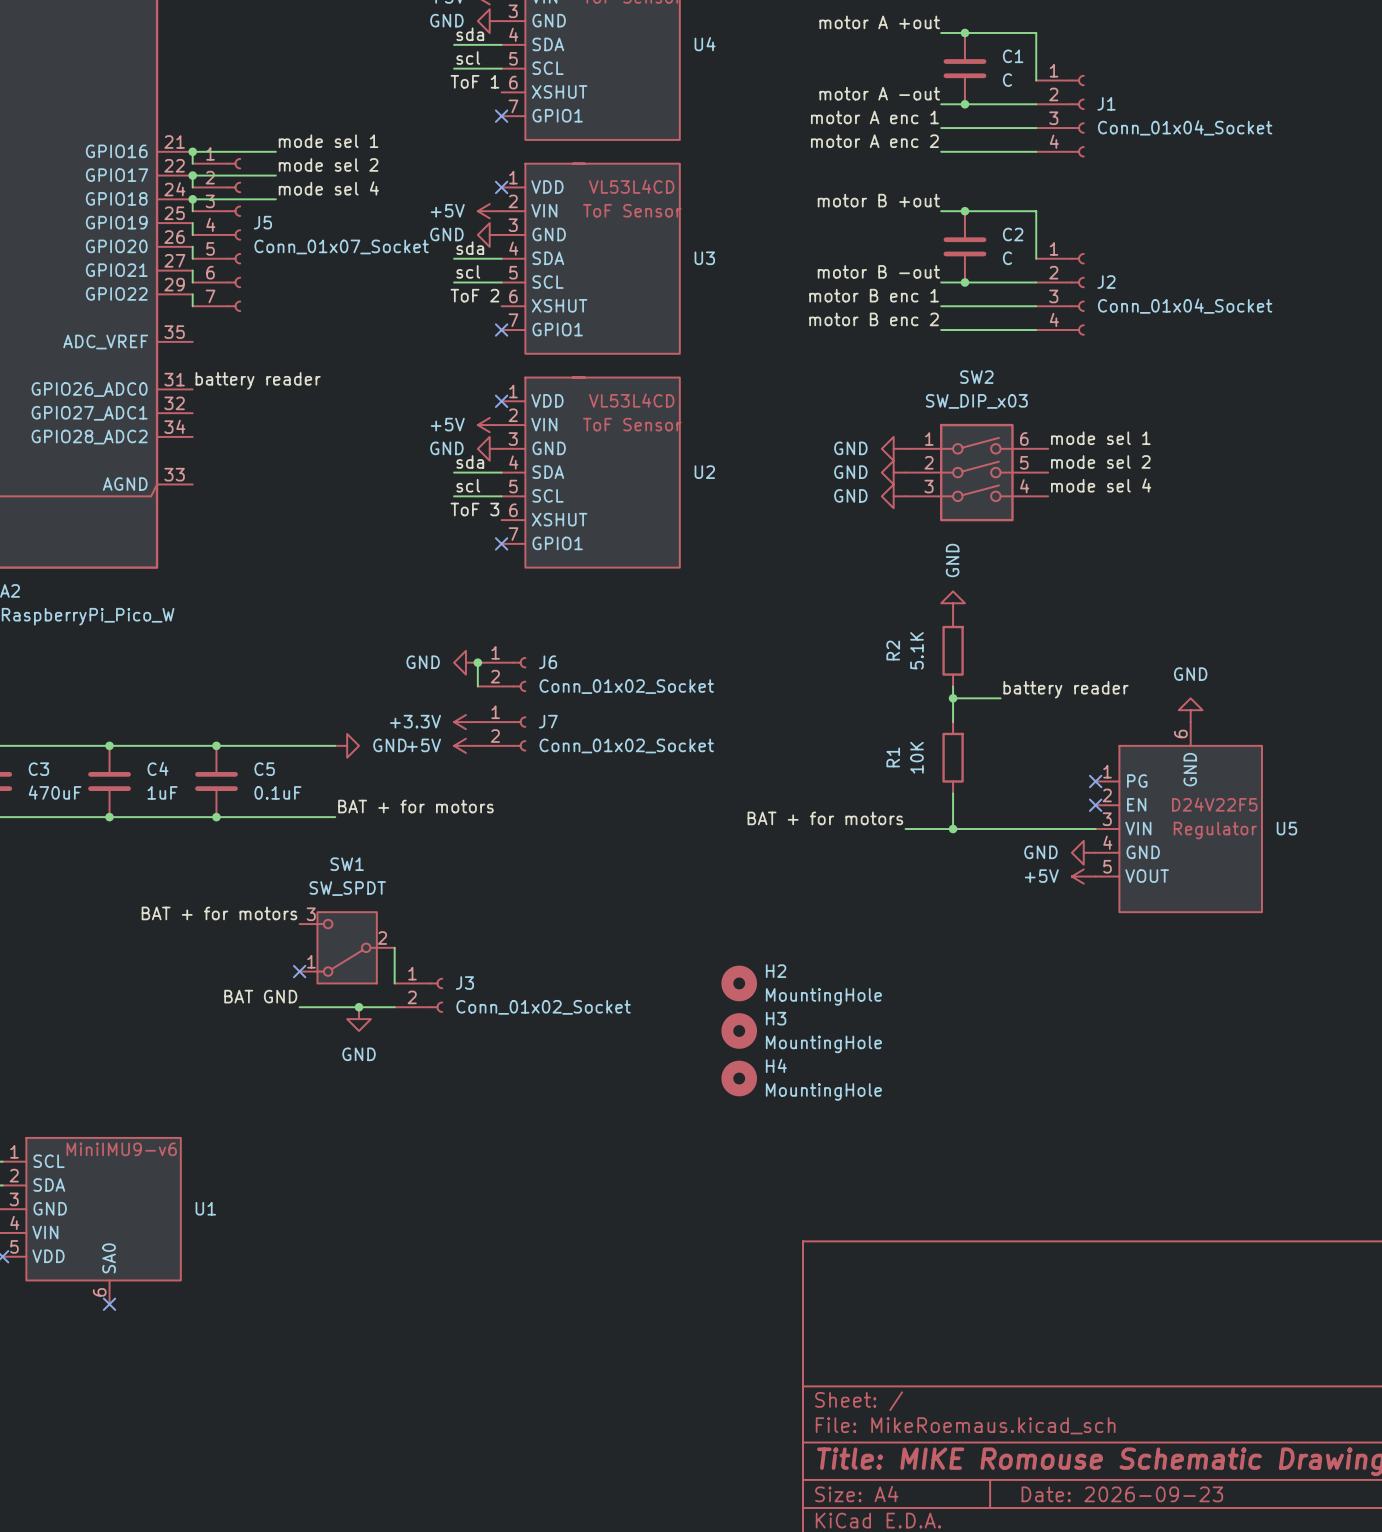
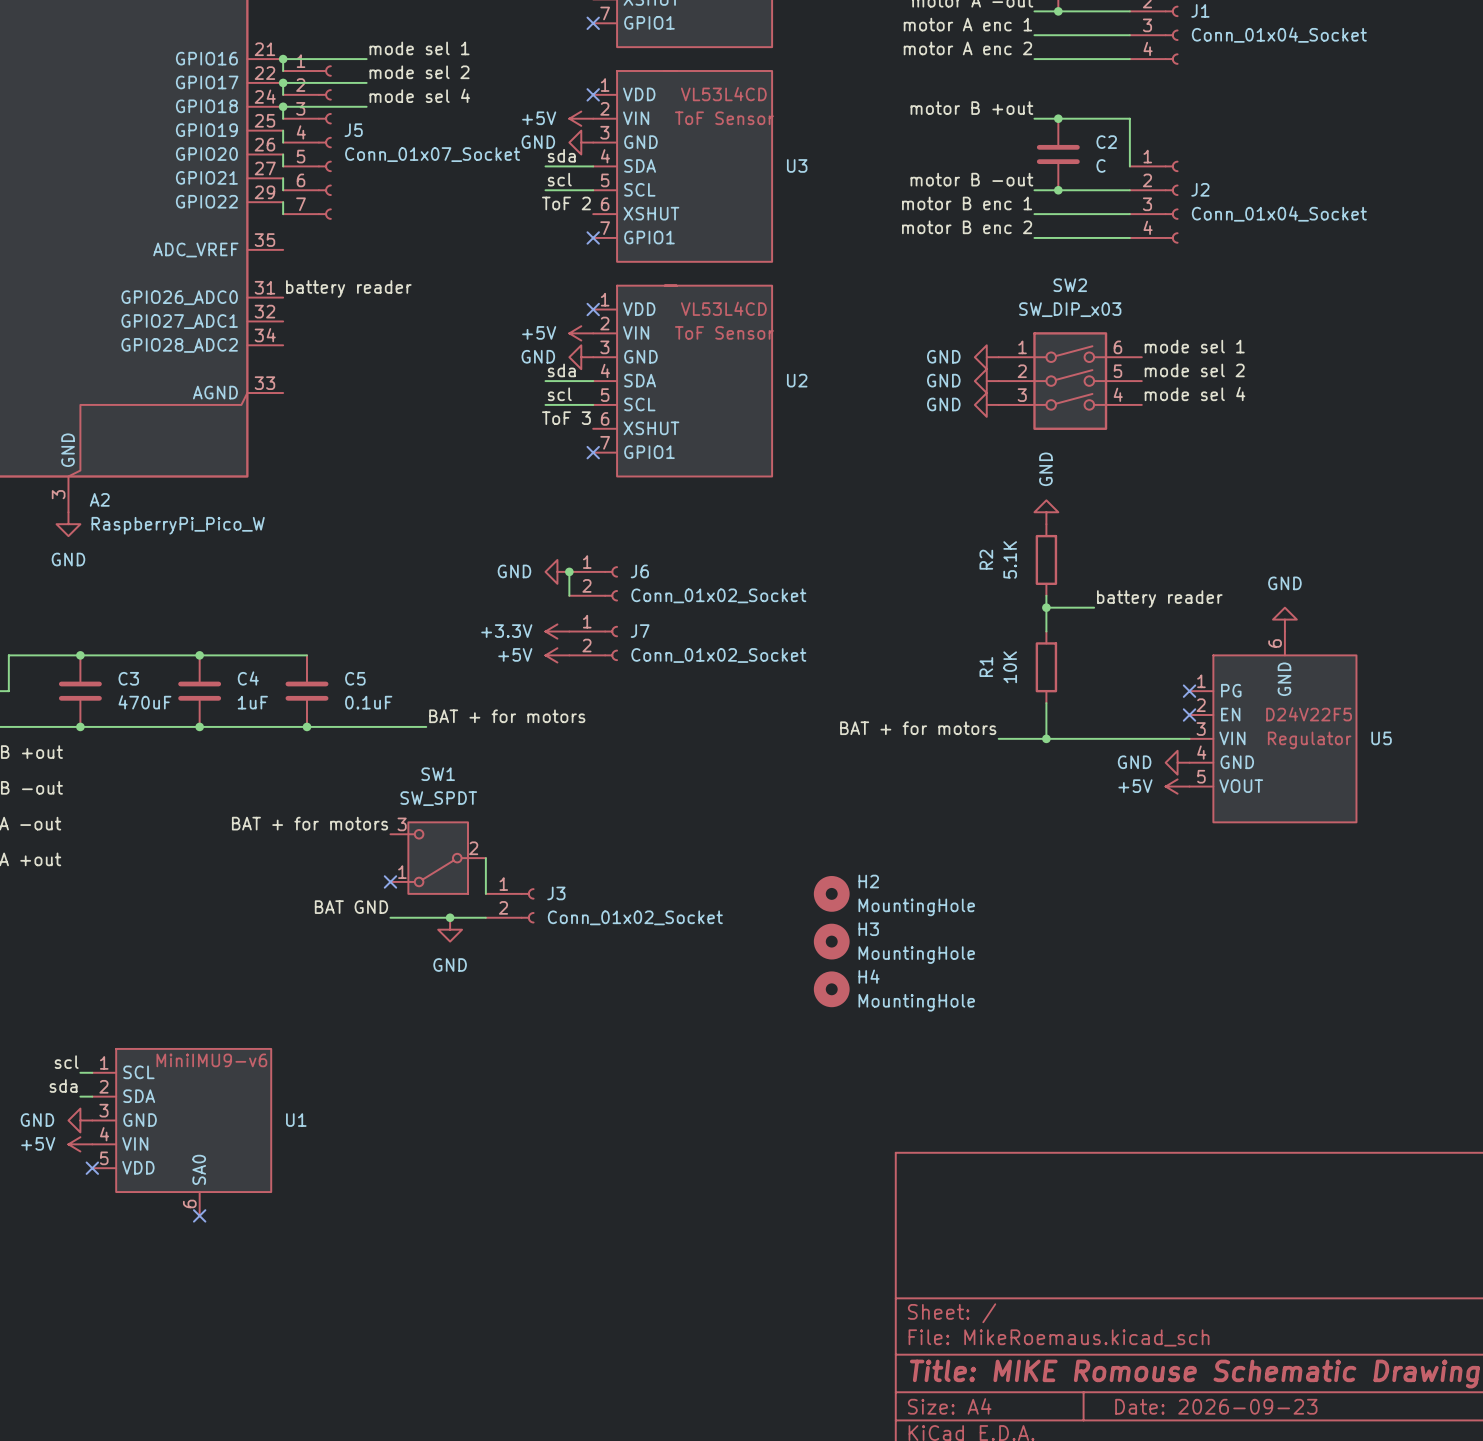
wire: (216, 745) (335, 745) -> none
junction: (216, 745) -> none
power symbol: GND (347, 745) -> none

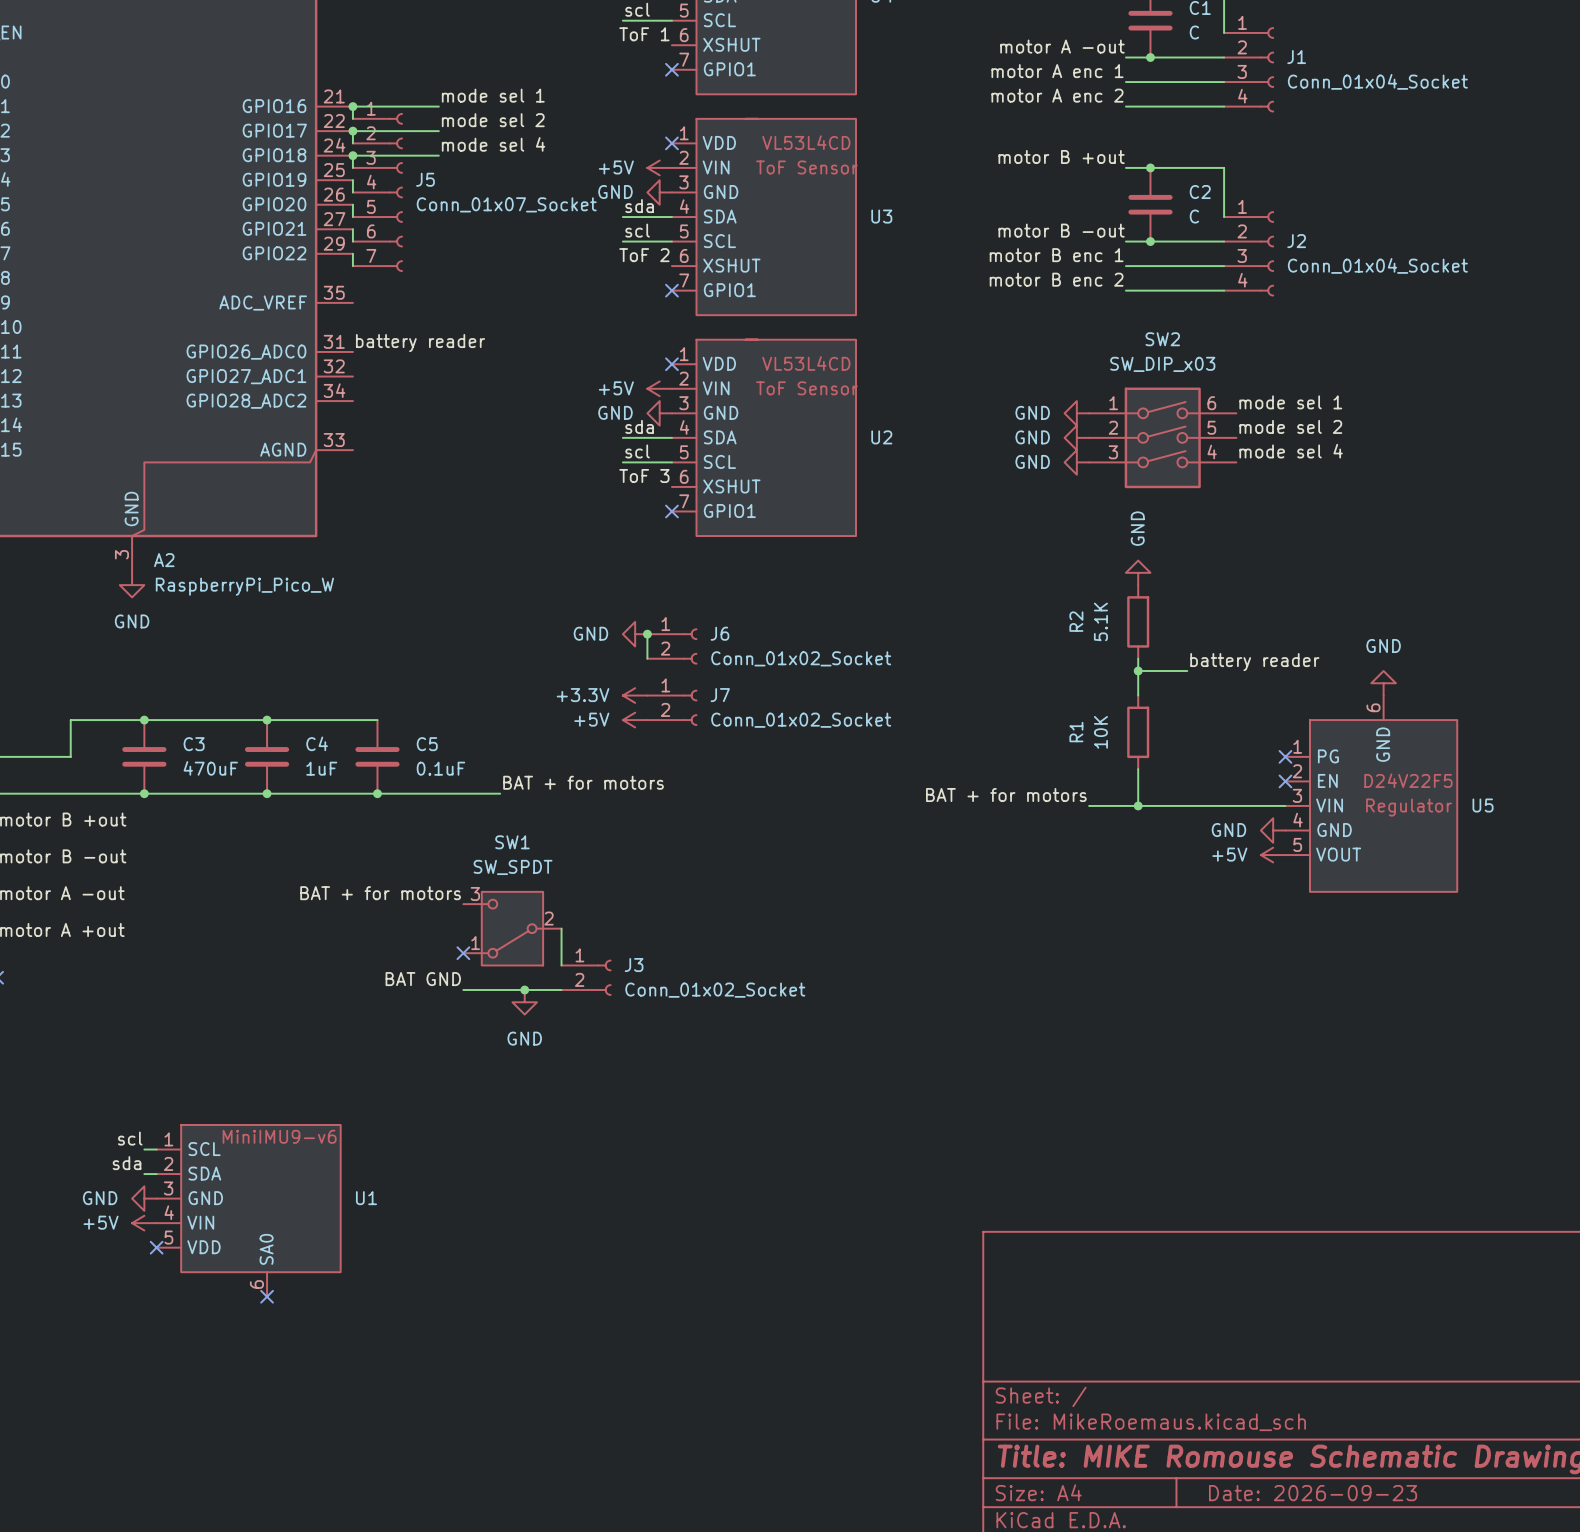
H2: MountingHole (831, 893) -> none
H3: MountingHole (831, 941) -> none
H4: MountingHole (831, 989) -> none

